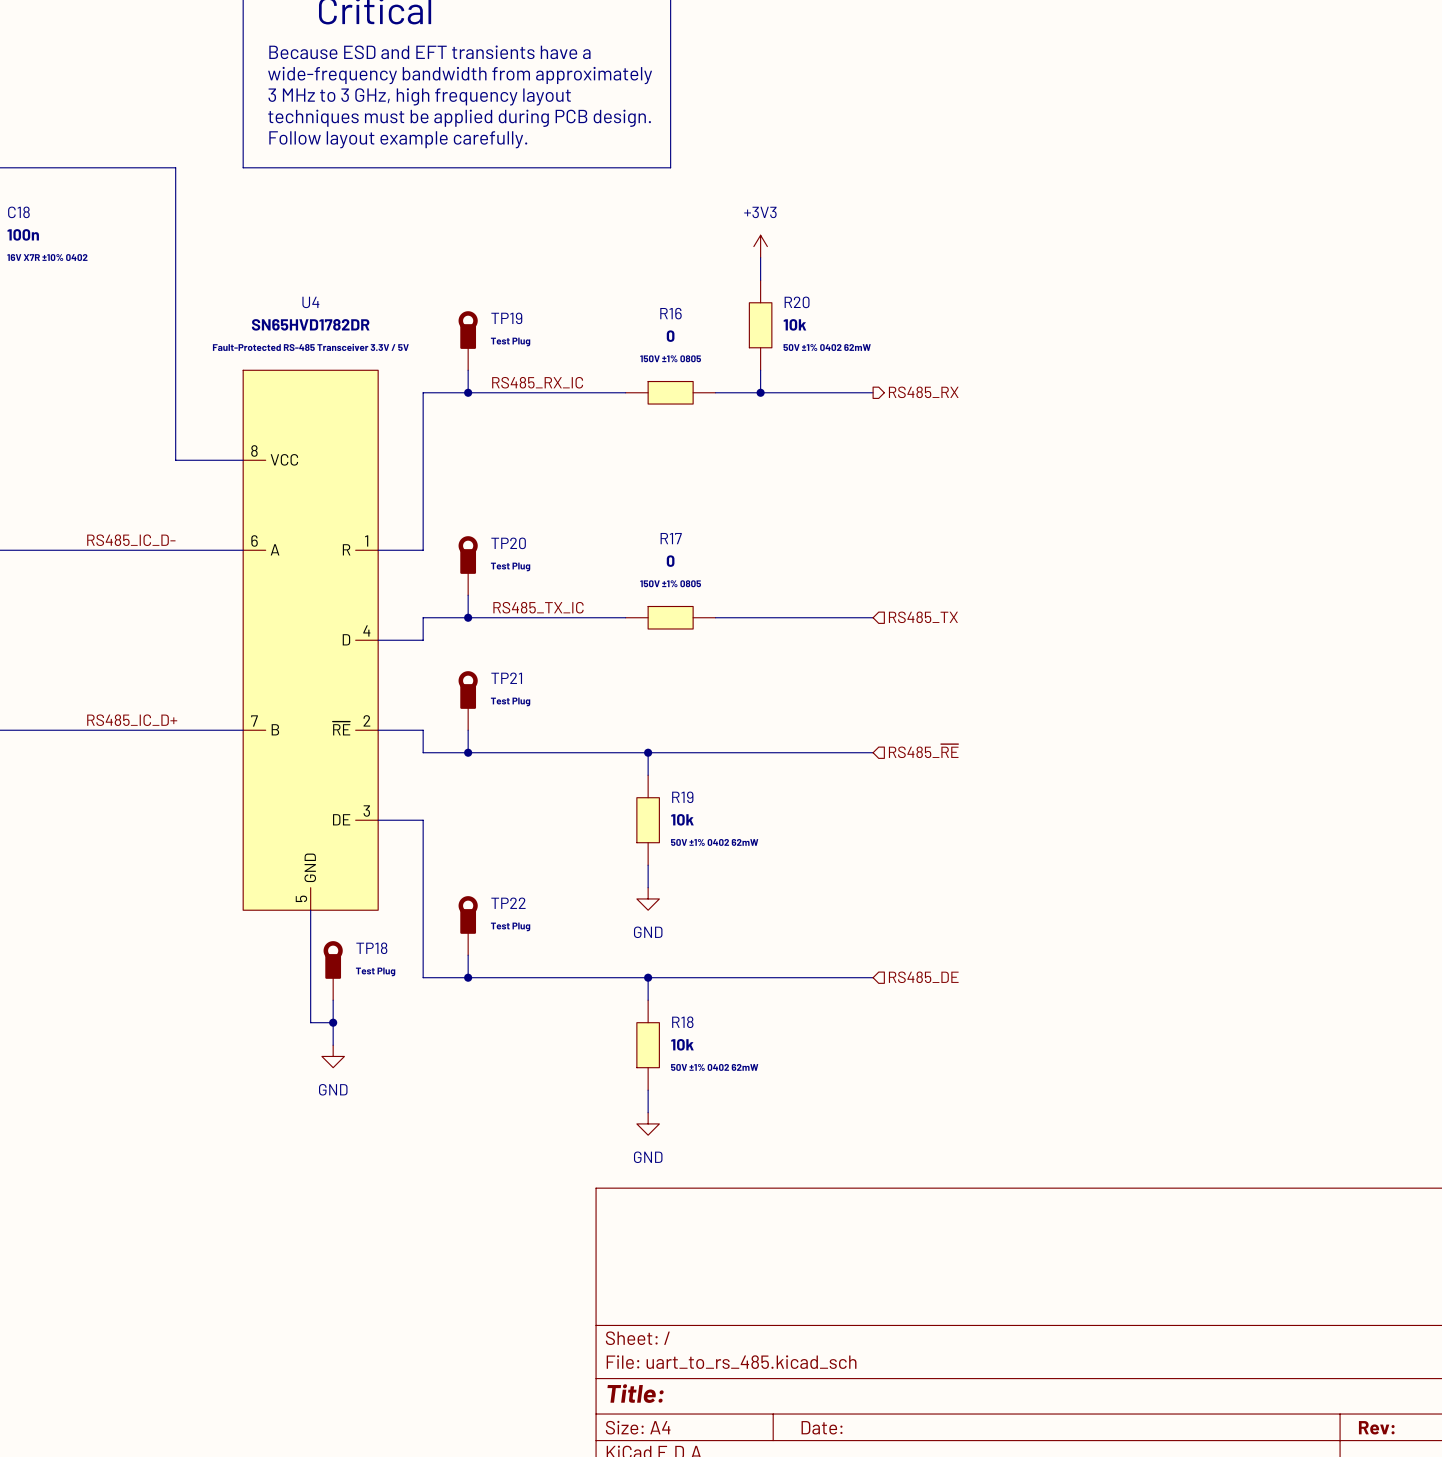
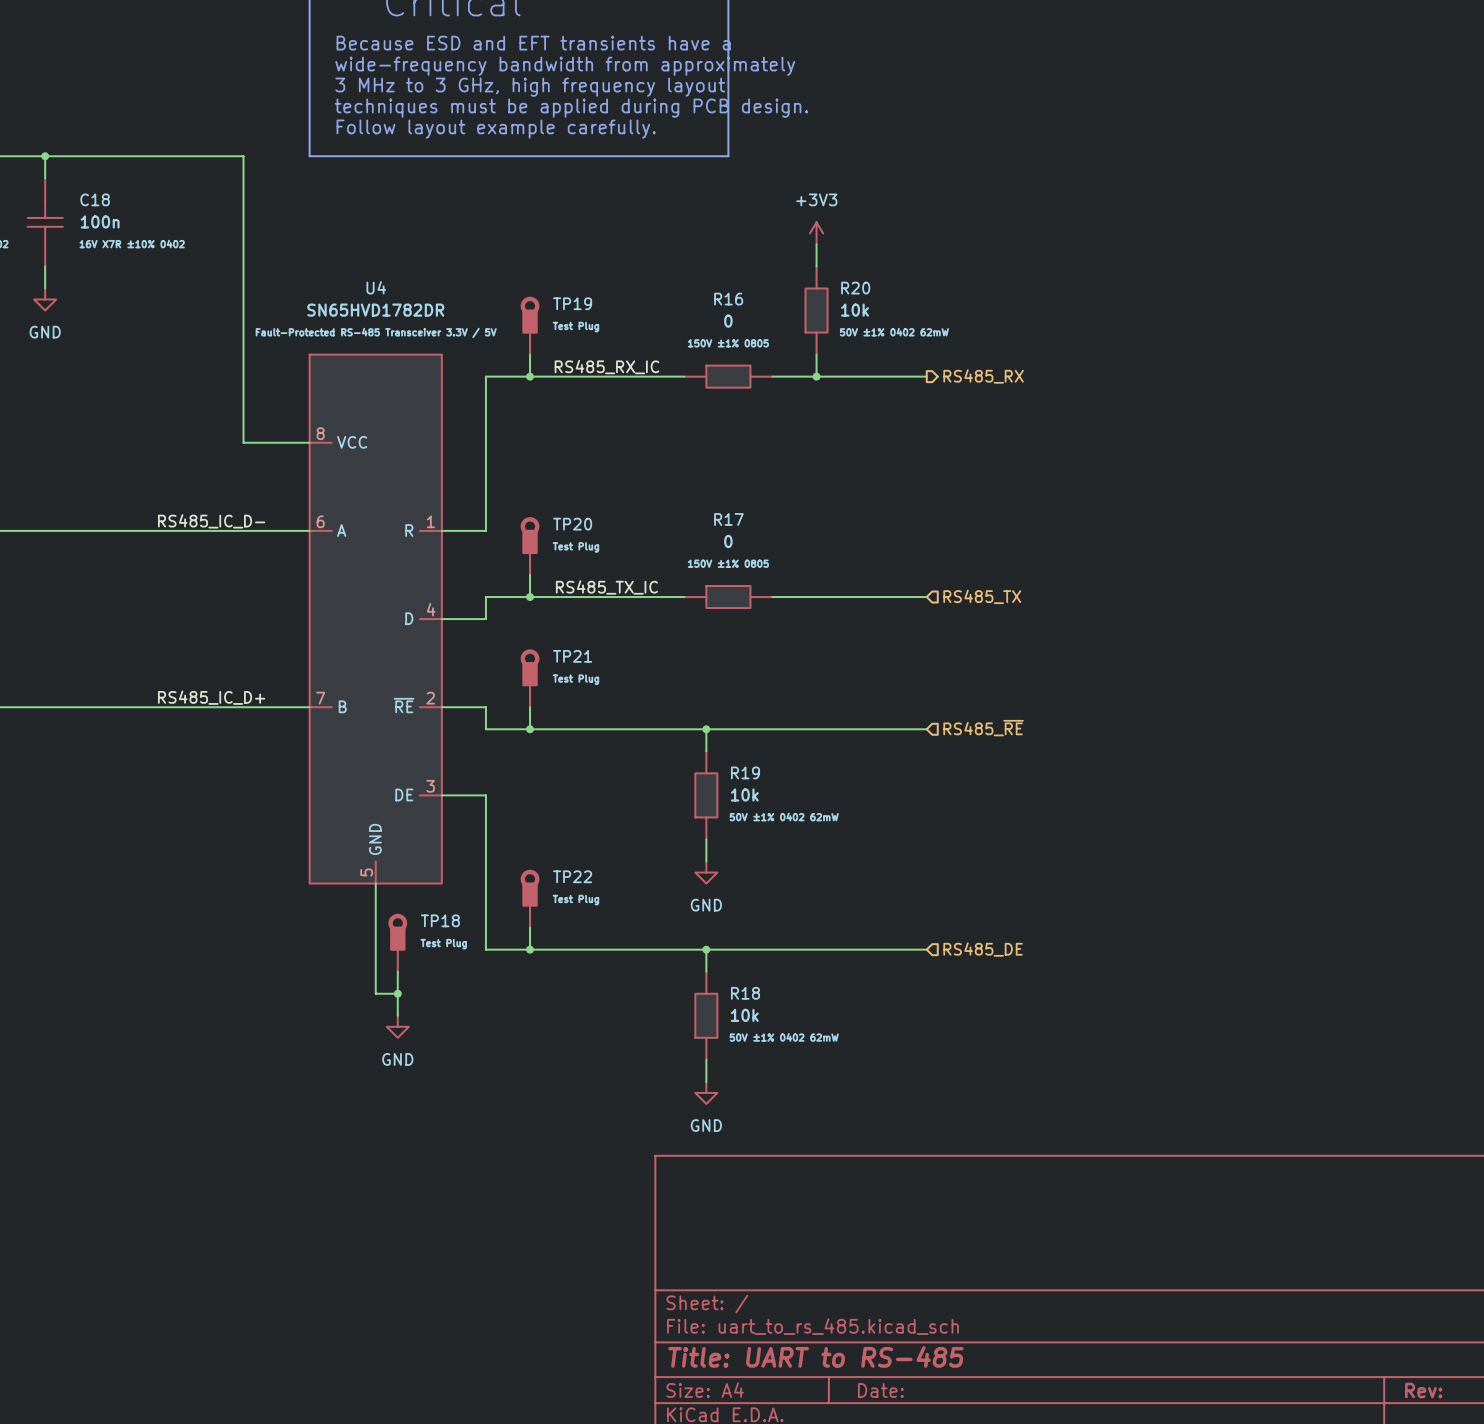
title block: Title: (635, 1393) -> Title: UART to RS-485 (815, 1356)

